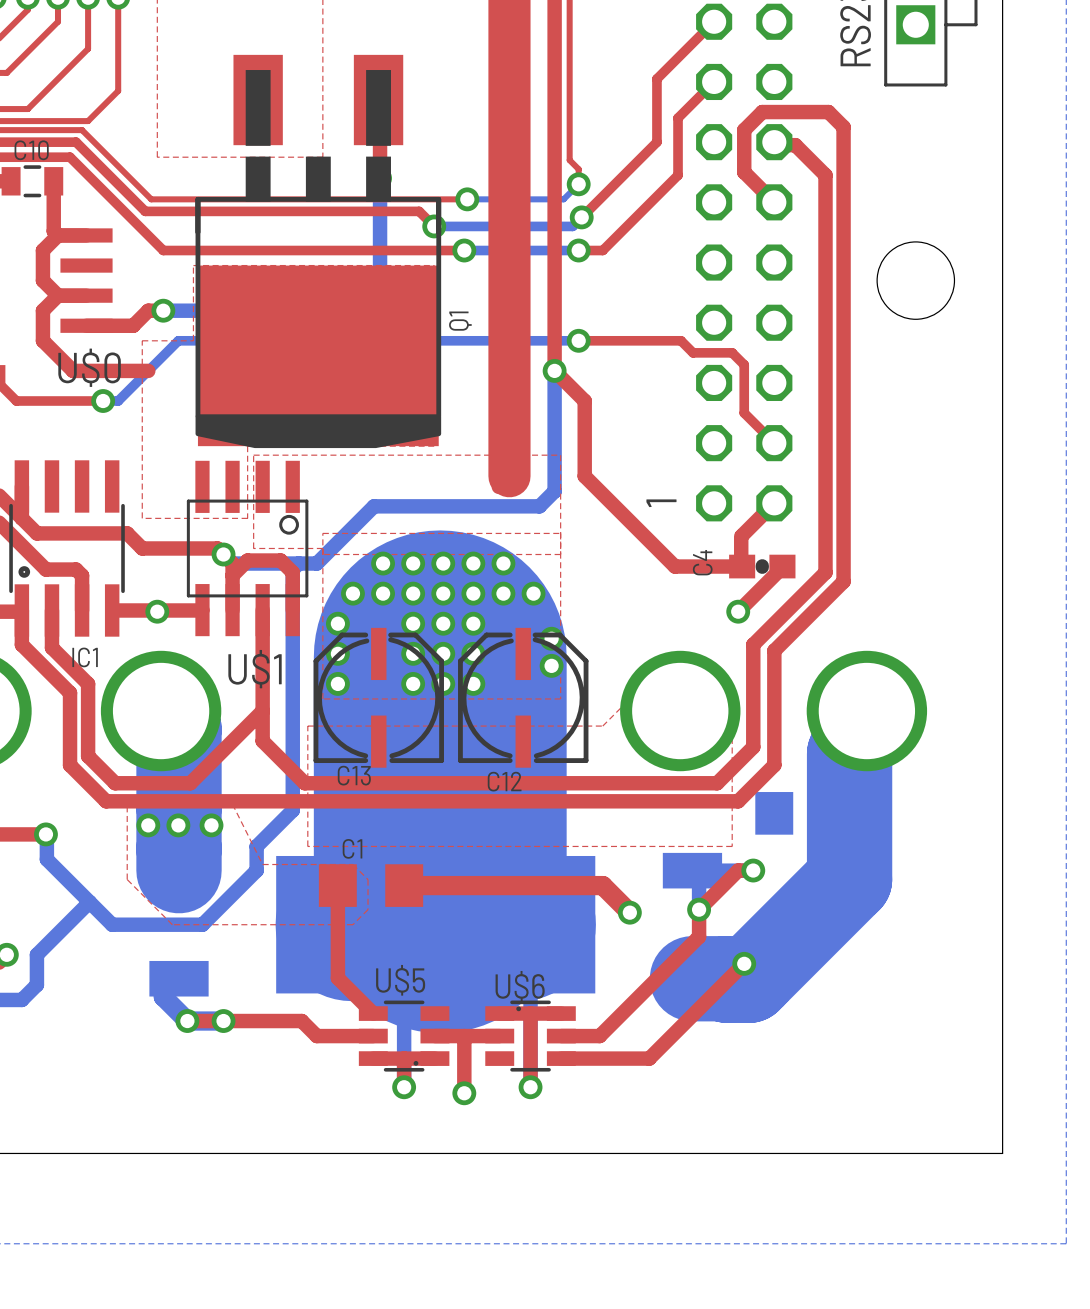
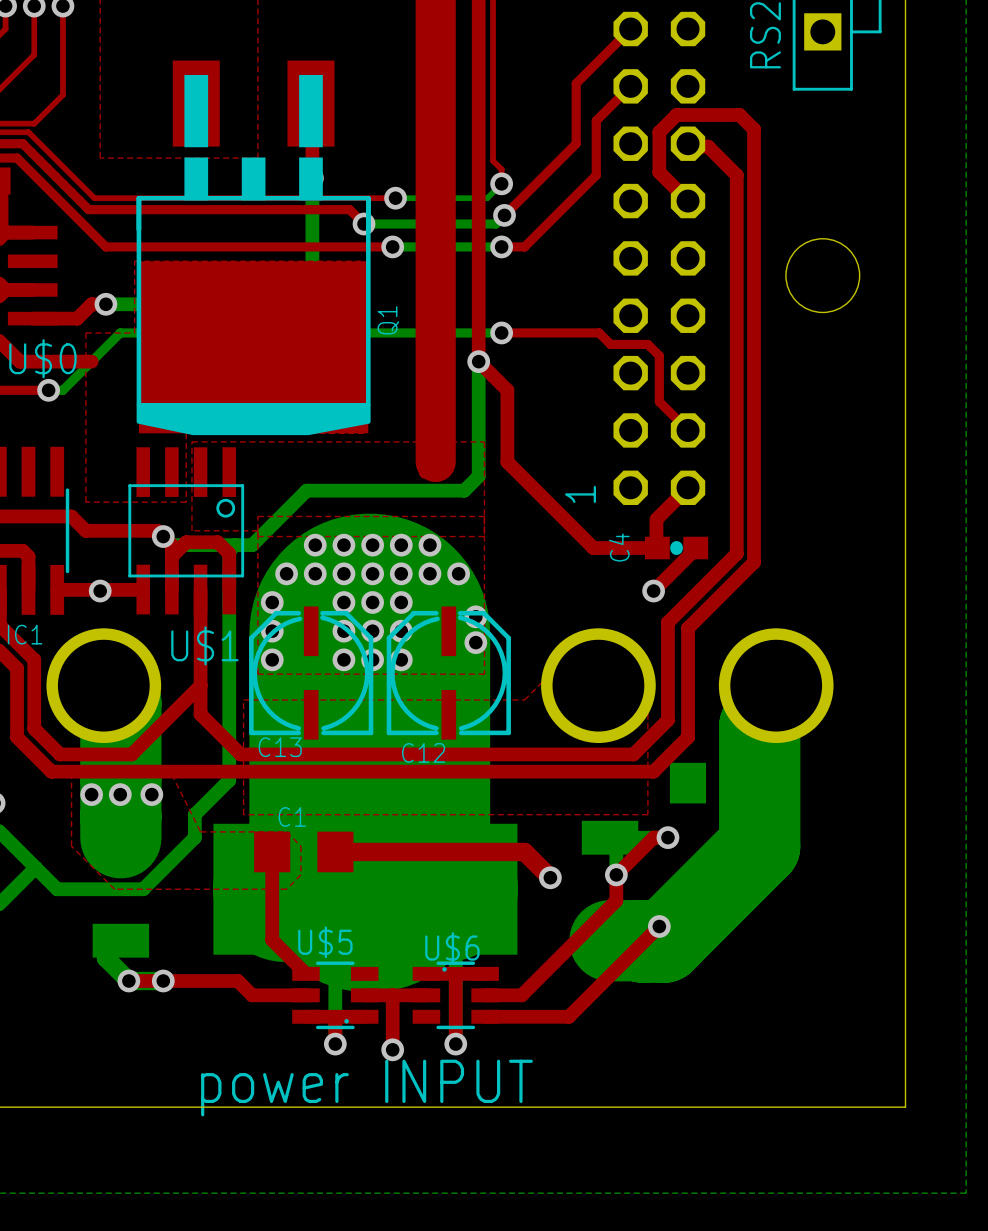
text: none -> power INPUT (366, 1088)

